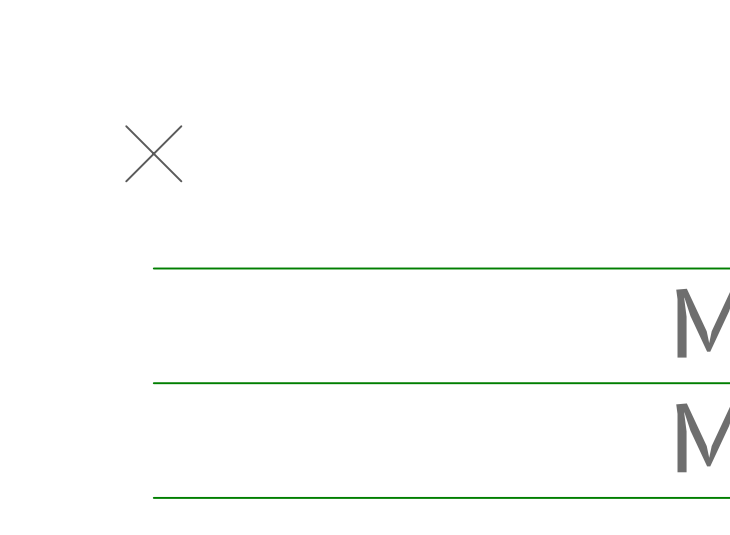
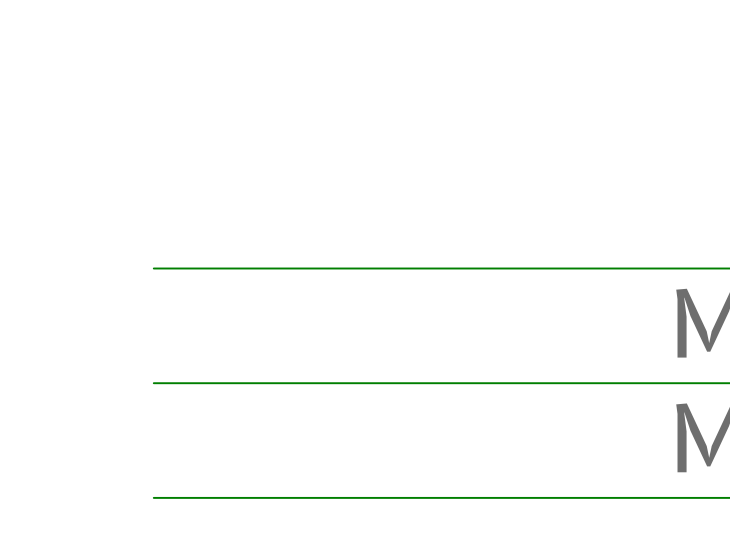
no-connect mark: (153, 153) -> none

